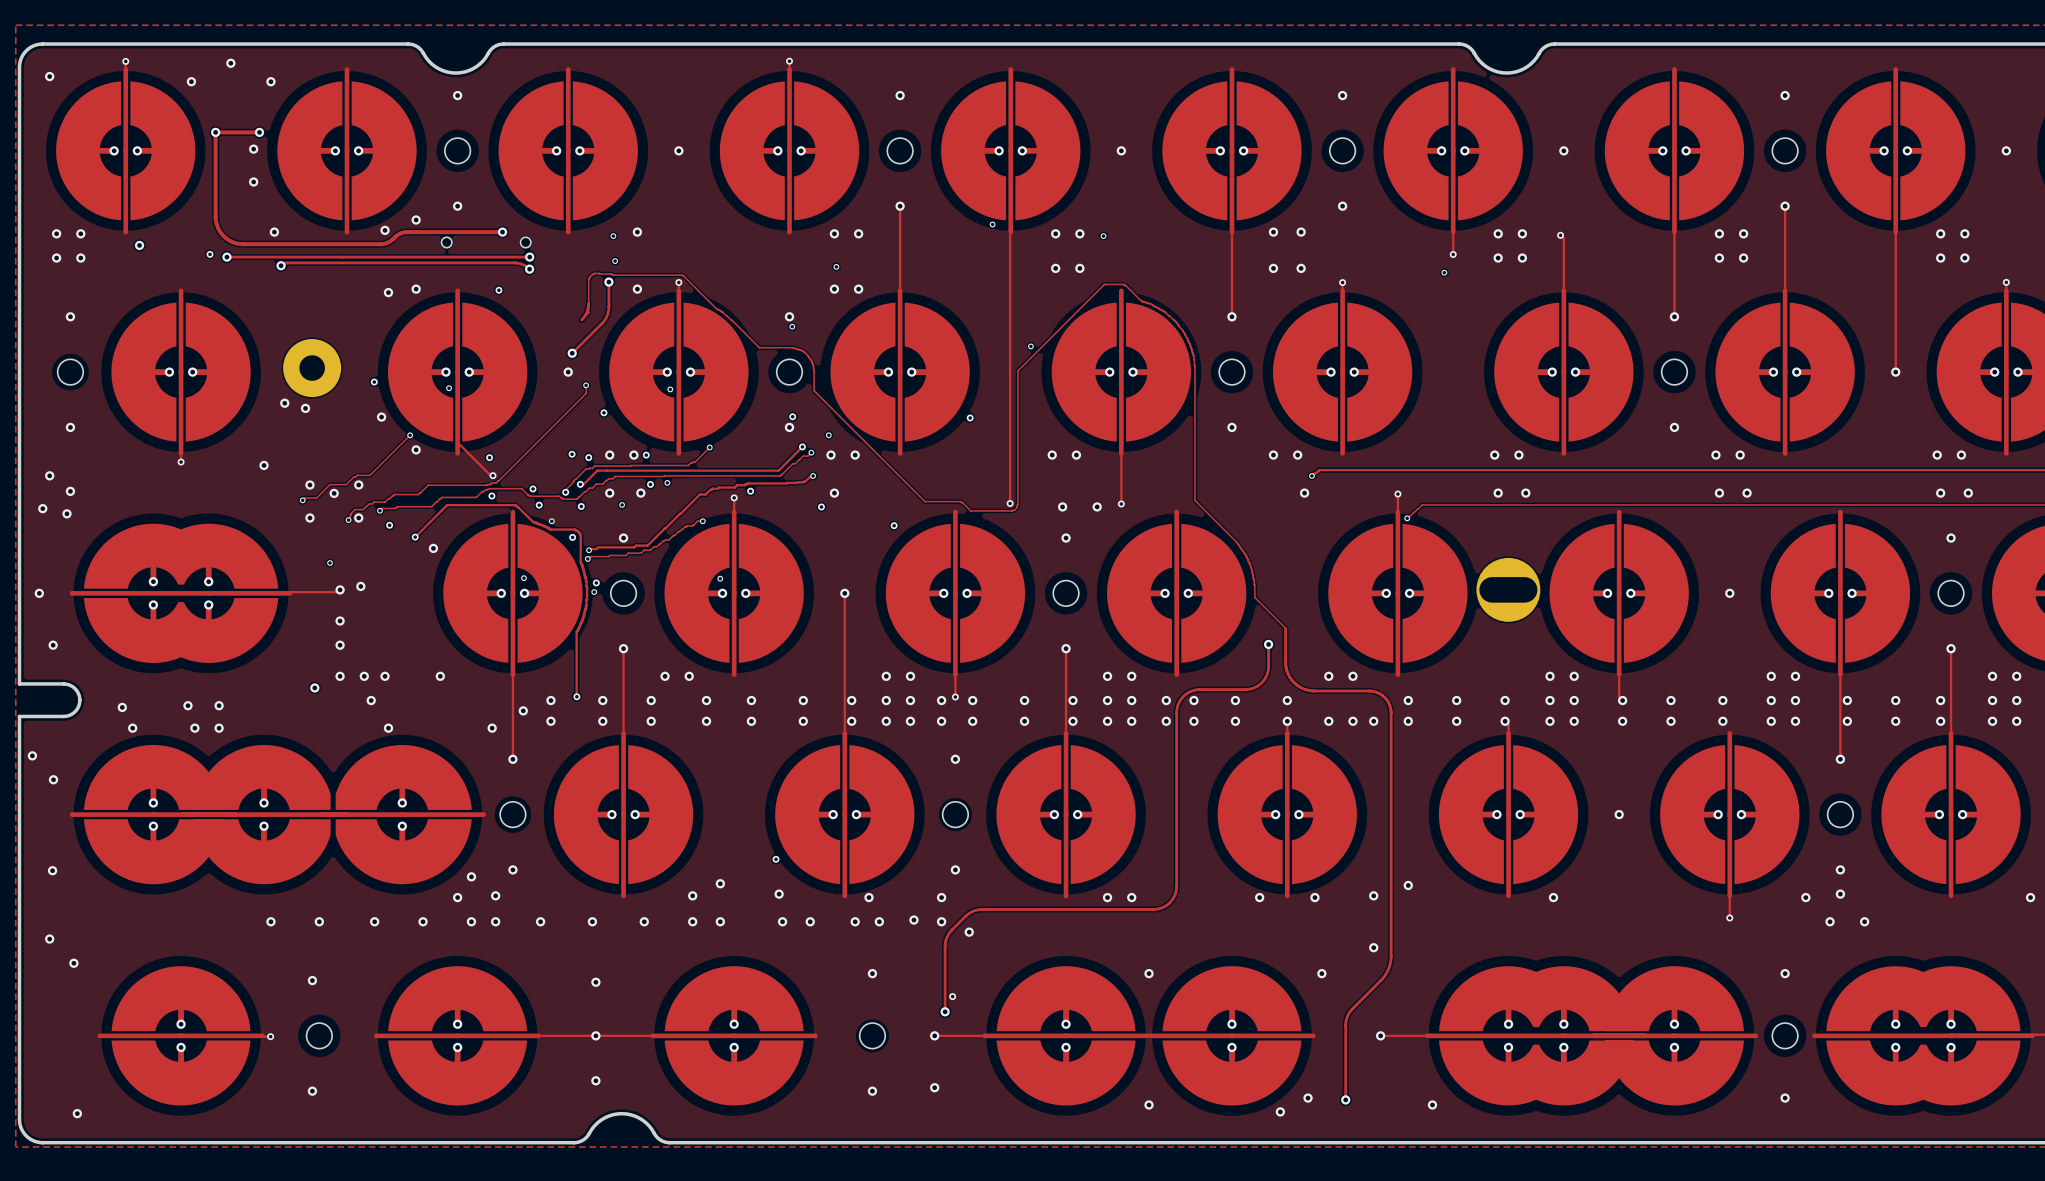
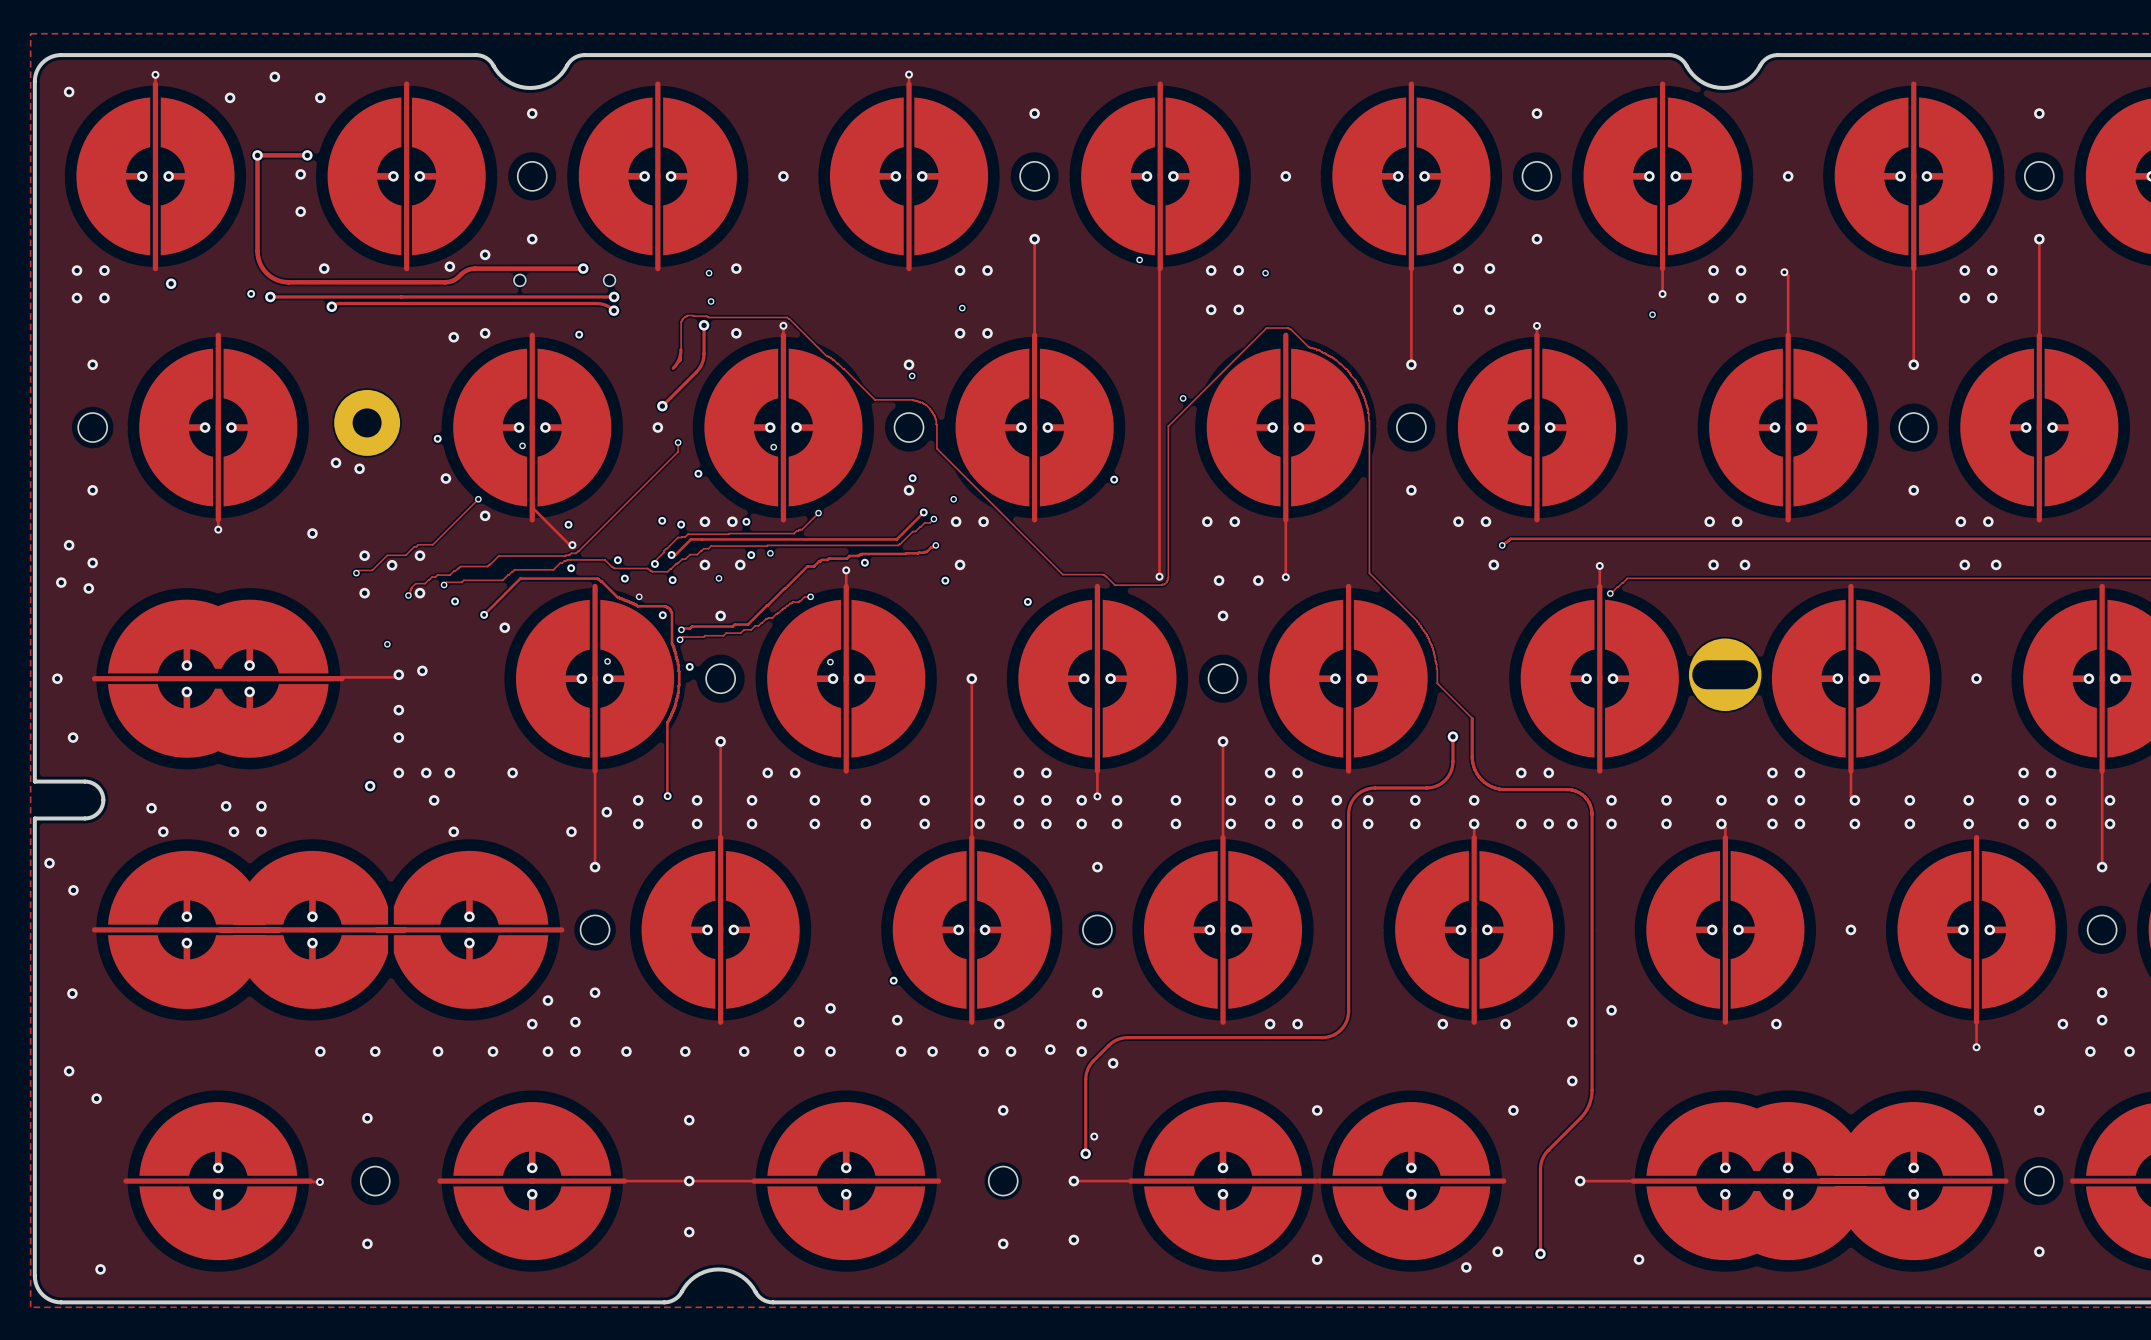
via: (594, 592) -> none

